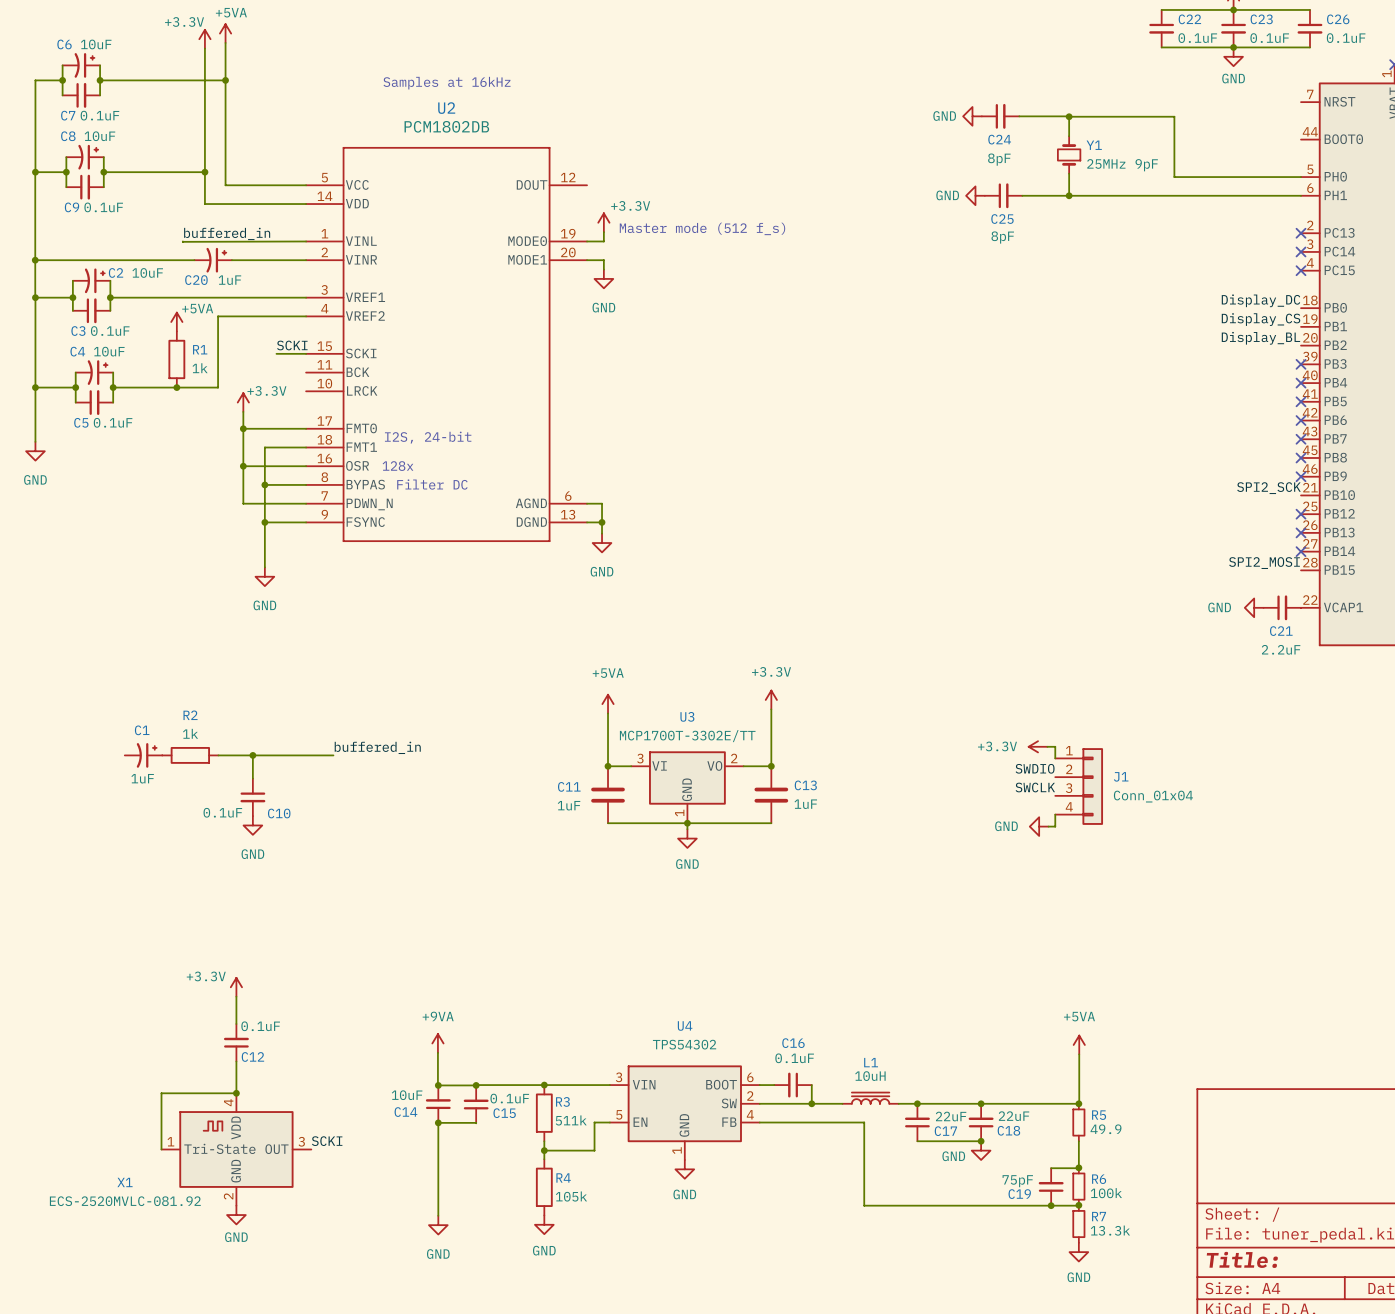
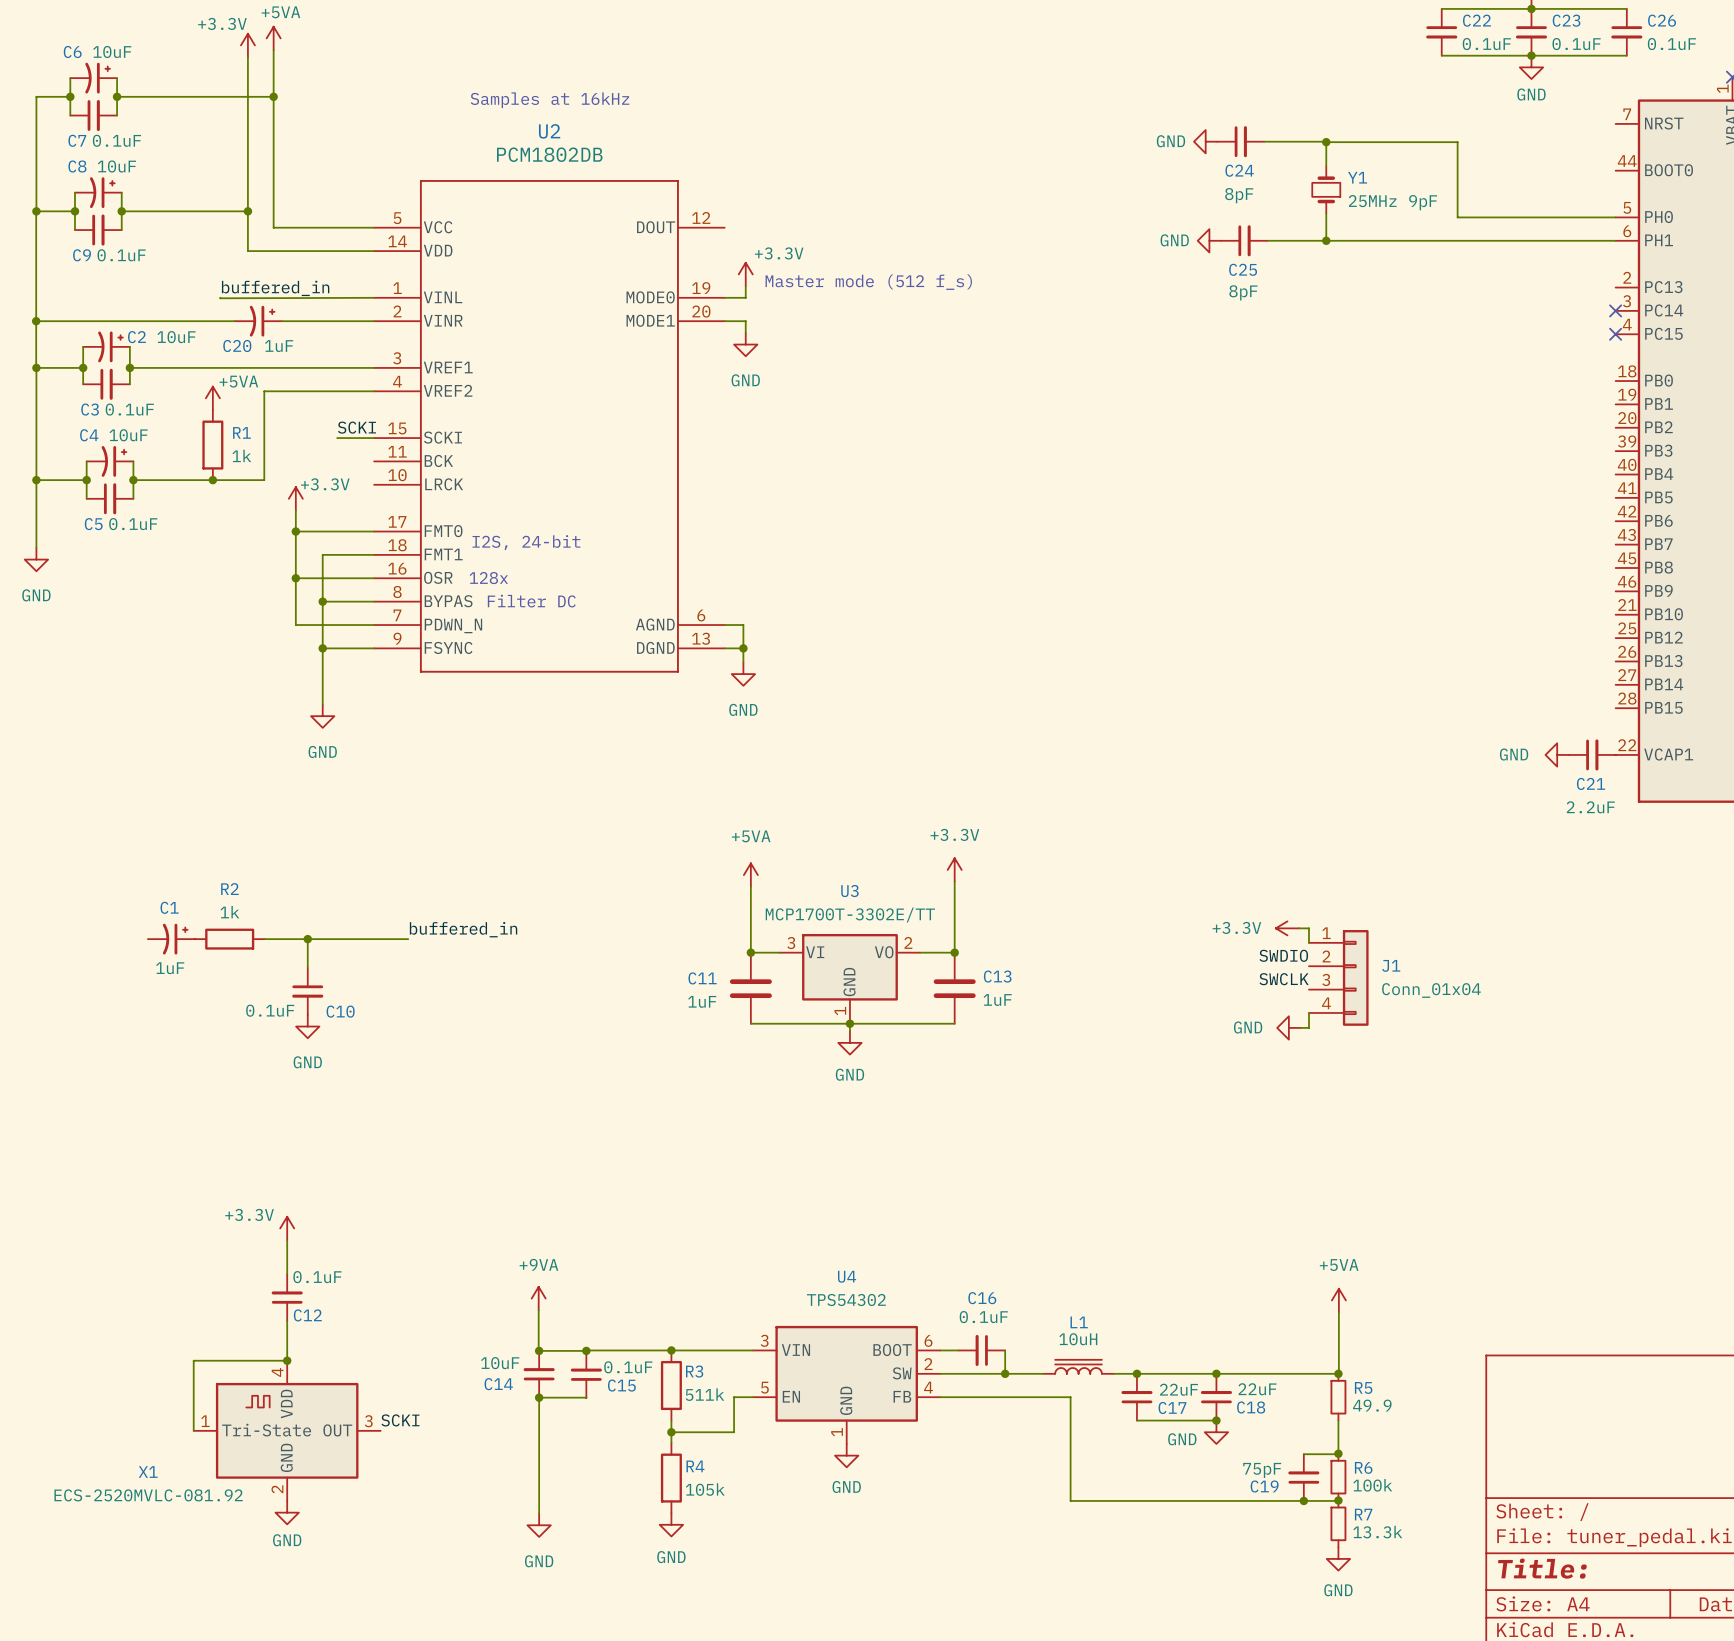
no-connect mark: (1301, 233) -> none
label: Display_DC (1260, 300) -> none
label: Display_CS (1261, 319) -> none
label: Display_BL (1260, 338) -> none
no-connect mark: (1301, 364) -> none
no-connect mark: (1301, 383) -> none
no-connect mark: (1301, 401) -> none
no-connect mark: (1301, 420) -> none
no-connect mark: (1301, 439) -> none
no-connect mark: (1301, 457) -> none
no-connect mark: (1301, 476) -> none
label: SPI2_SCK (1268, 488) -> none
no-connect mark: (1301, 514) -> none
no-connect mark: (1301, 532) -> none
no-connect mark: (1301, 551) -> none
label: SPI2_MOSI (1264, 563) -> none

